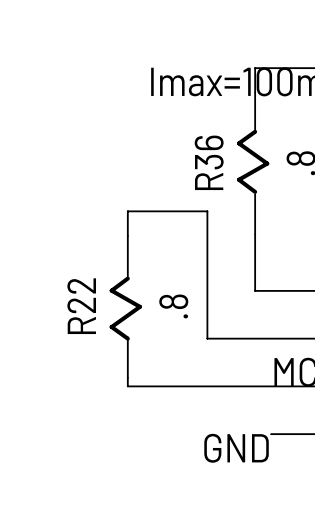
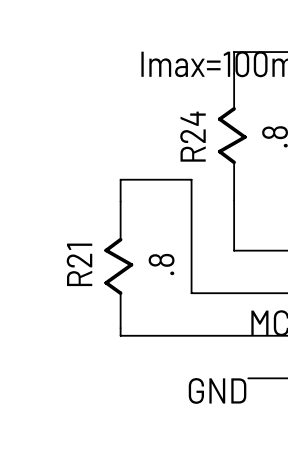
R36 name: R36 (209, 162) -> R24 (192, 136)
R22 name: R22 (81, 306) -> R21 (79, 264)

